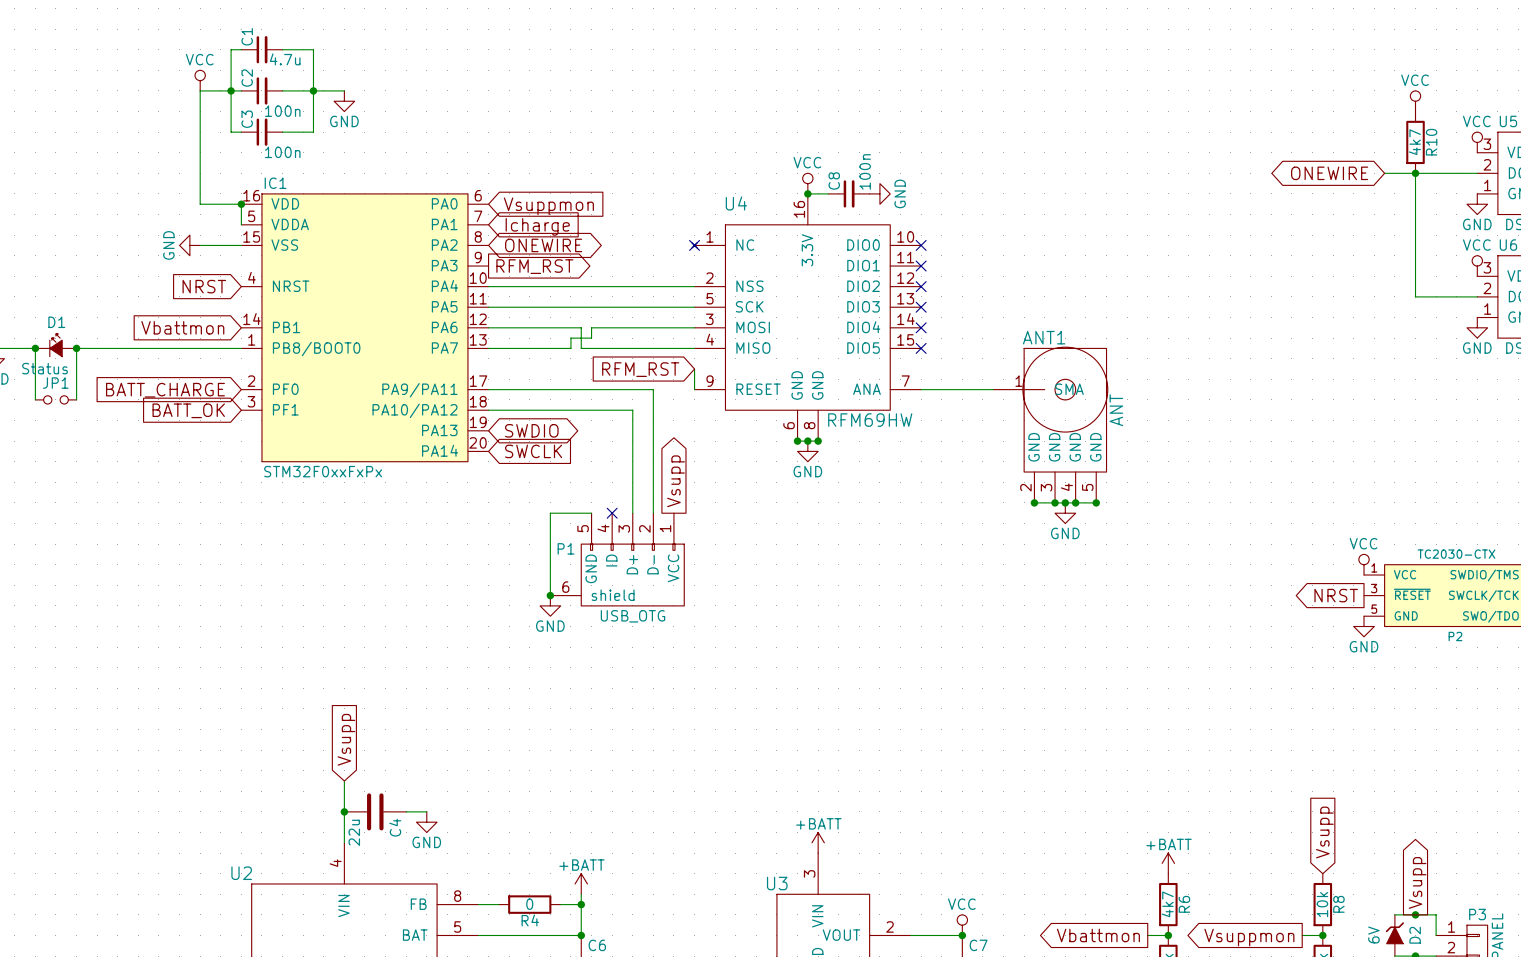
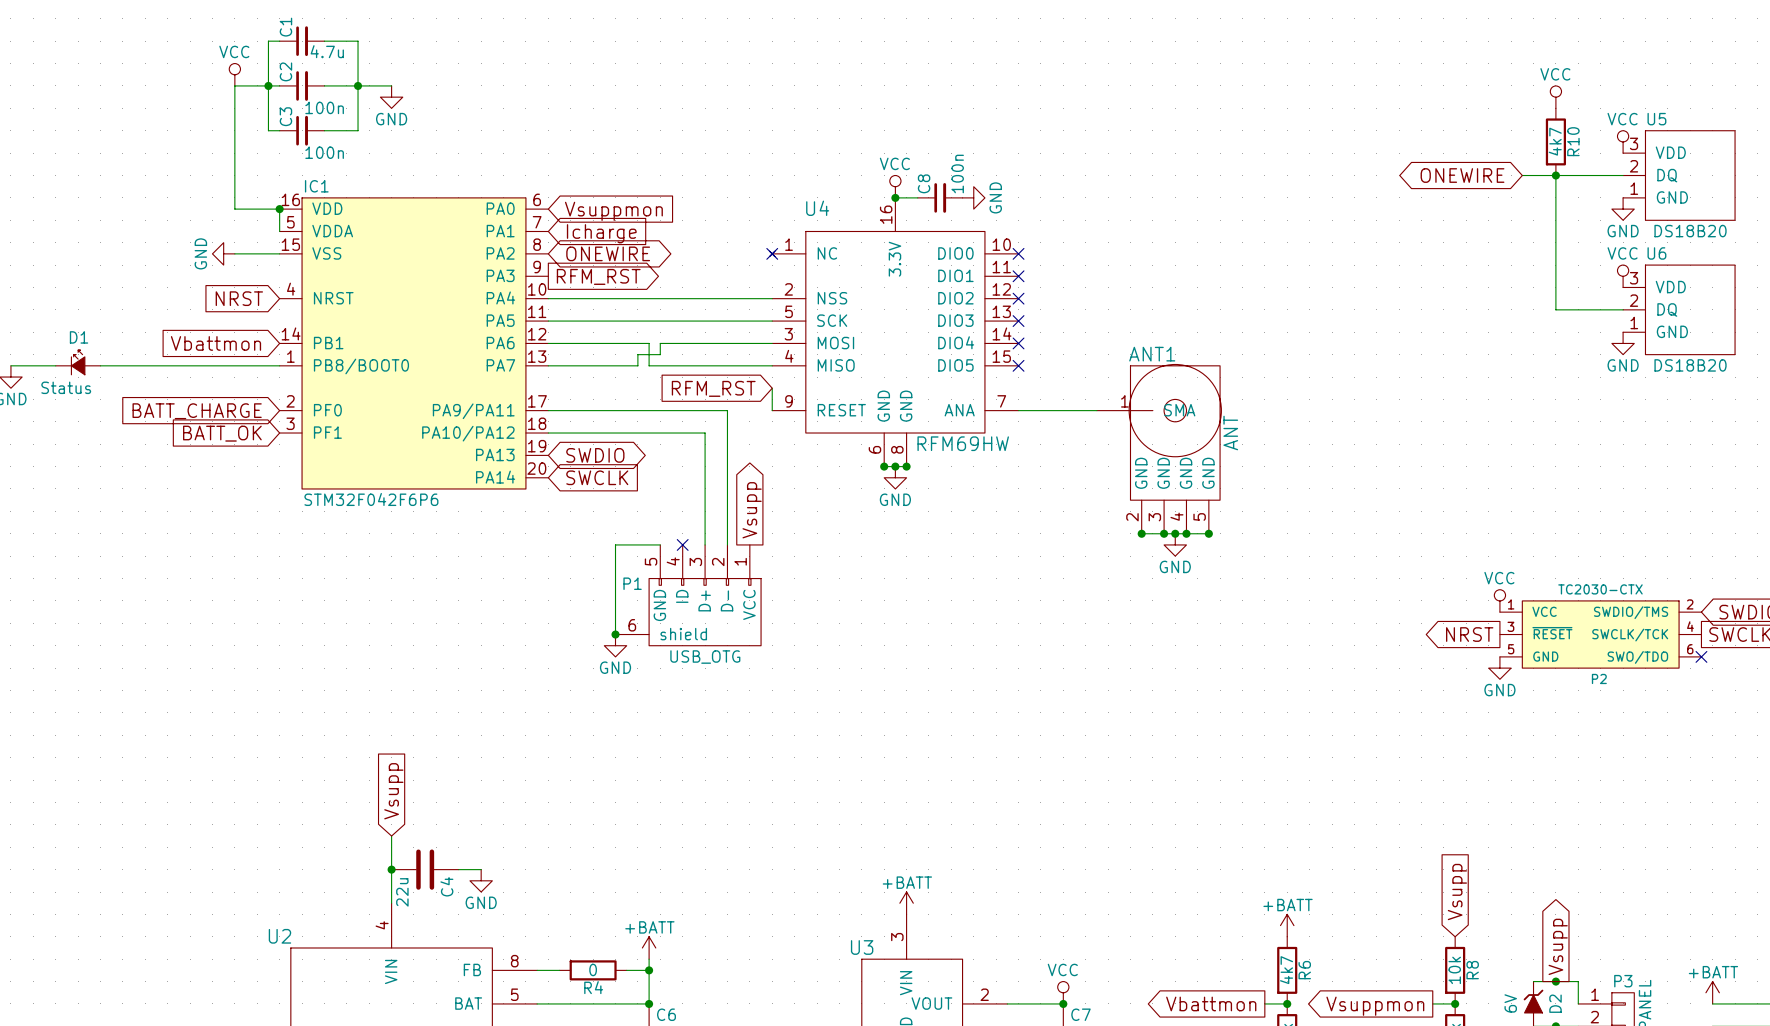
wire: (35, 348) (35, 399) -> none
junction: (35, 348) -> none
wire: (76, 348) (76, 399) -> none
junction: (76, 348) -> none
JP1: (55, 399) -> none
IC1 value: STM32F0xxFxPx (323, 471) -> STM32F042F6P6 (371, 499)

